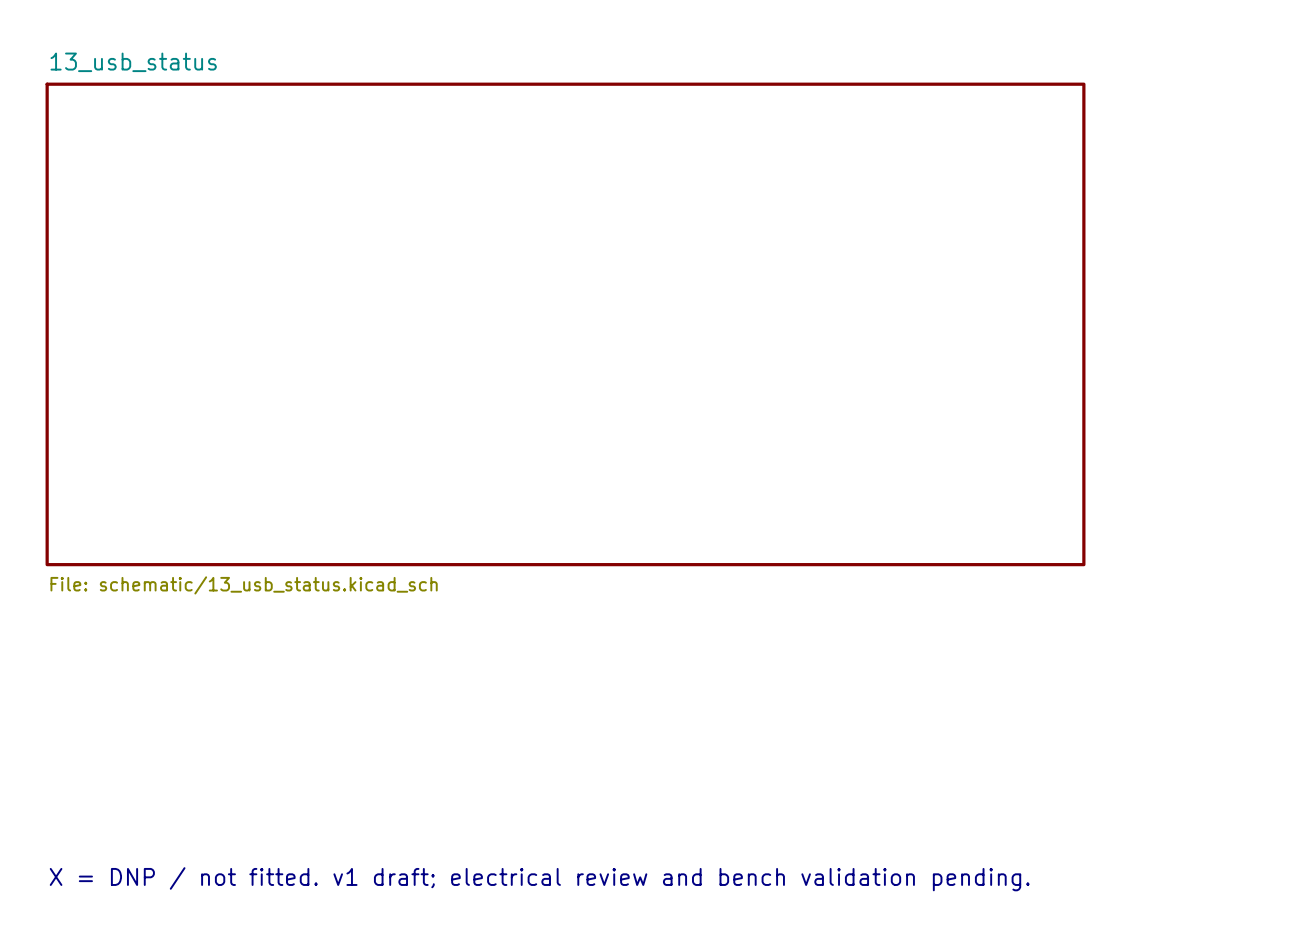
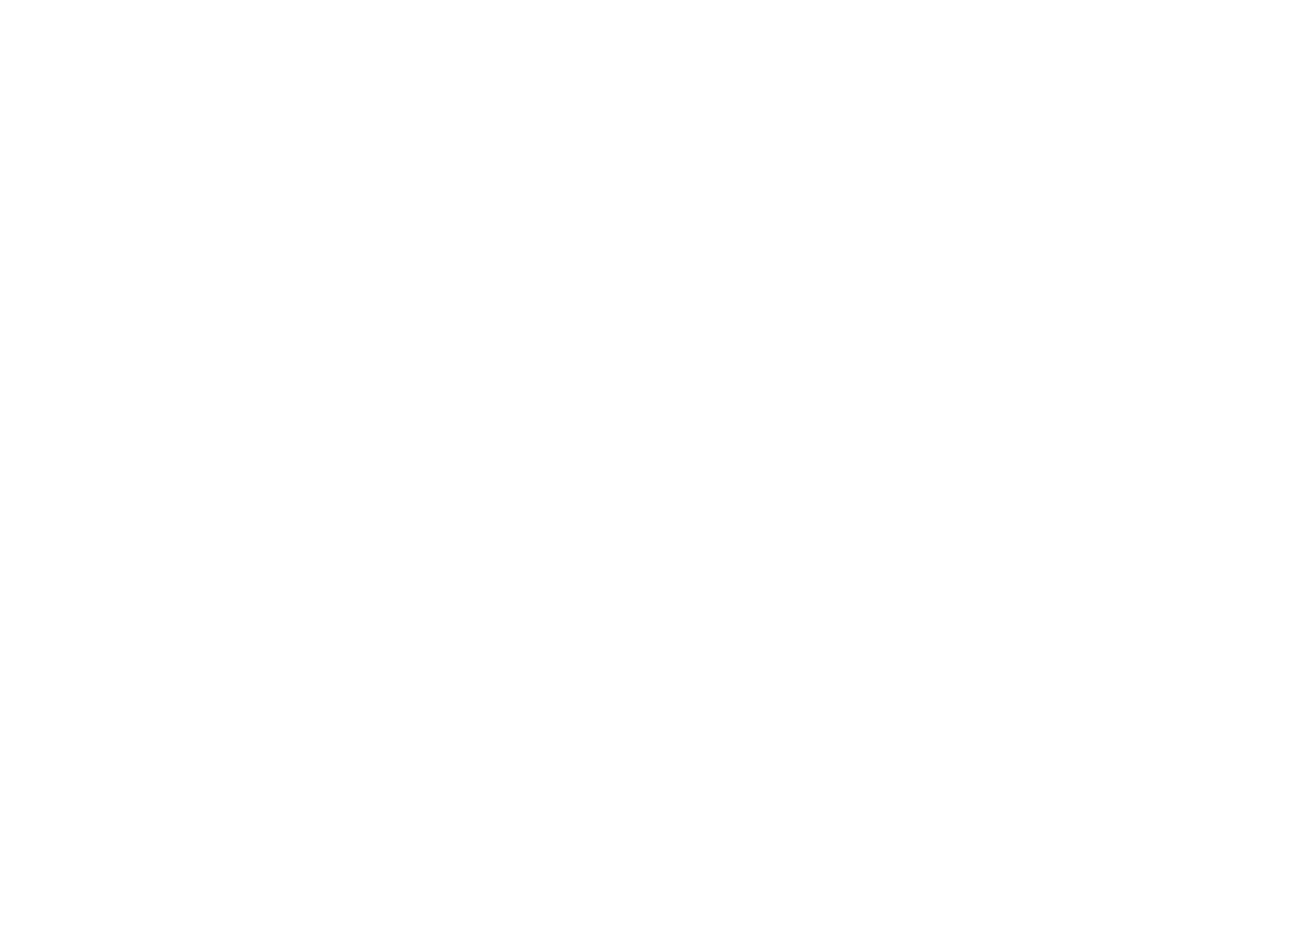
sheet 13_usb_status: File: schematic/13_usb_status.kicad_sch (565, 324) -> none
text: X = DNP / not fitted. v1 draft; electrical review and bench validation pending. (539, 879) -> none

